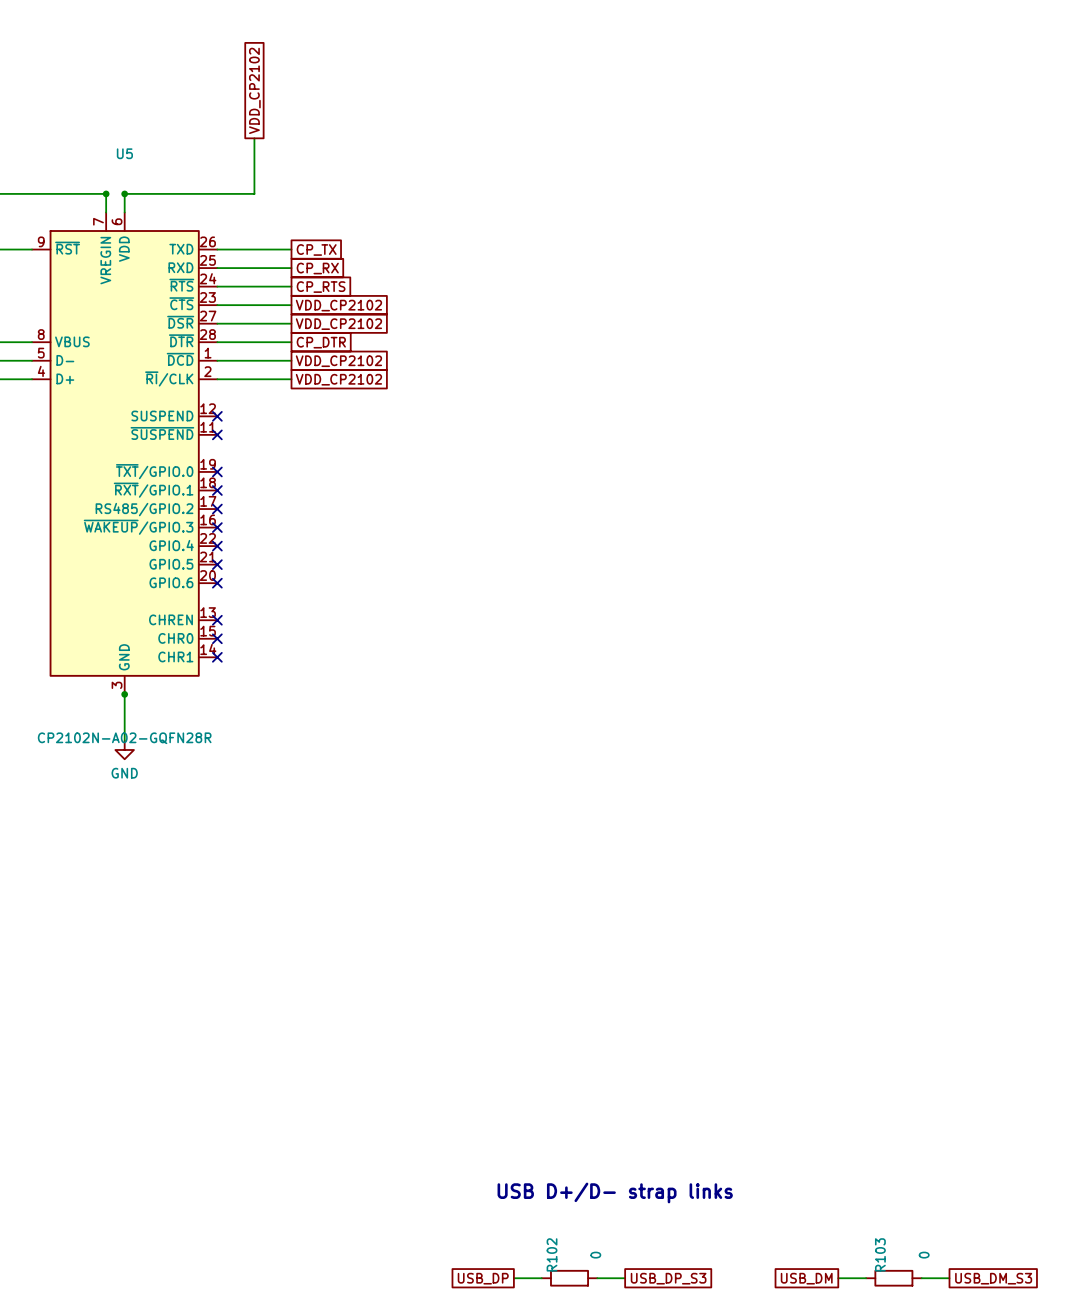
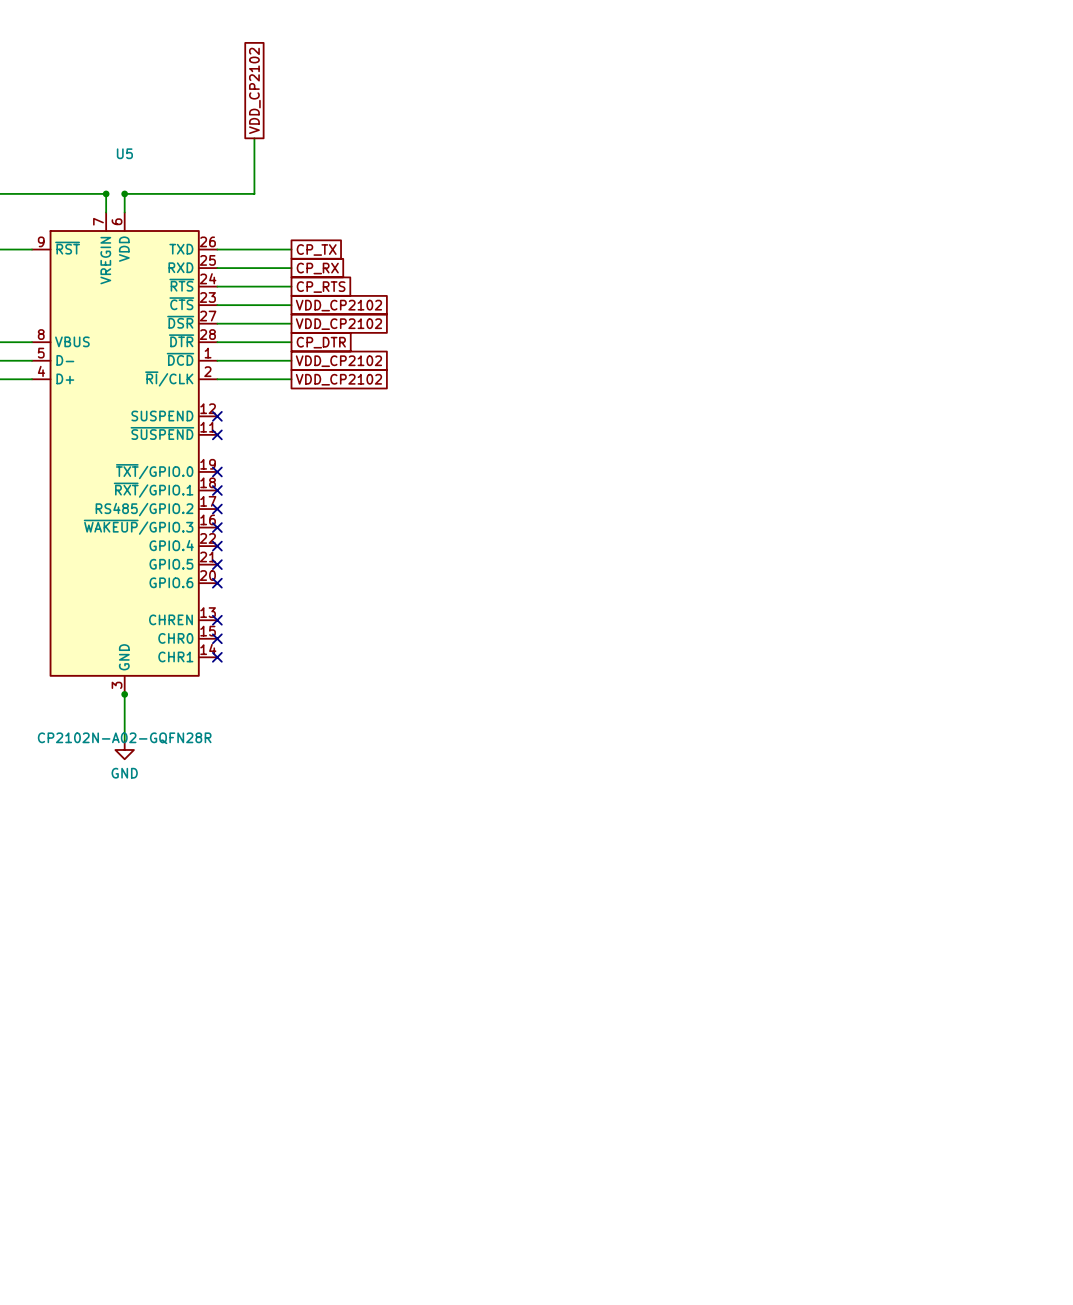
text: USB D+/D- strap links (615, 1192) -> none
global label: USB_DP (483, 1278) -> none
wire: (513, 1278) (541, 1278) -> none
R102: 0 (569, 1278) -> none
wire: (597, 1278) (625, 1278) -> none
global label: USB_DP_S3 (668, 1278) -> none
global label: USB_DM (806, 1278) -> none
wire: (838, 1278) (866, 1278) -> none
R103: 0 (893, 1278) -> none
wire: (921, 1278) (949, 1278) -> none
global label: USB_DM_S3 (993, 1278) -> none

